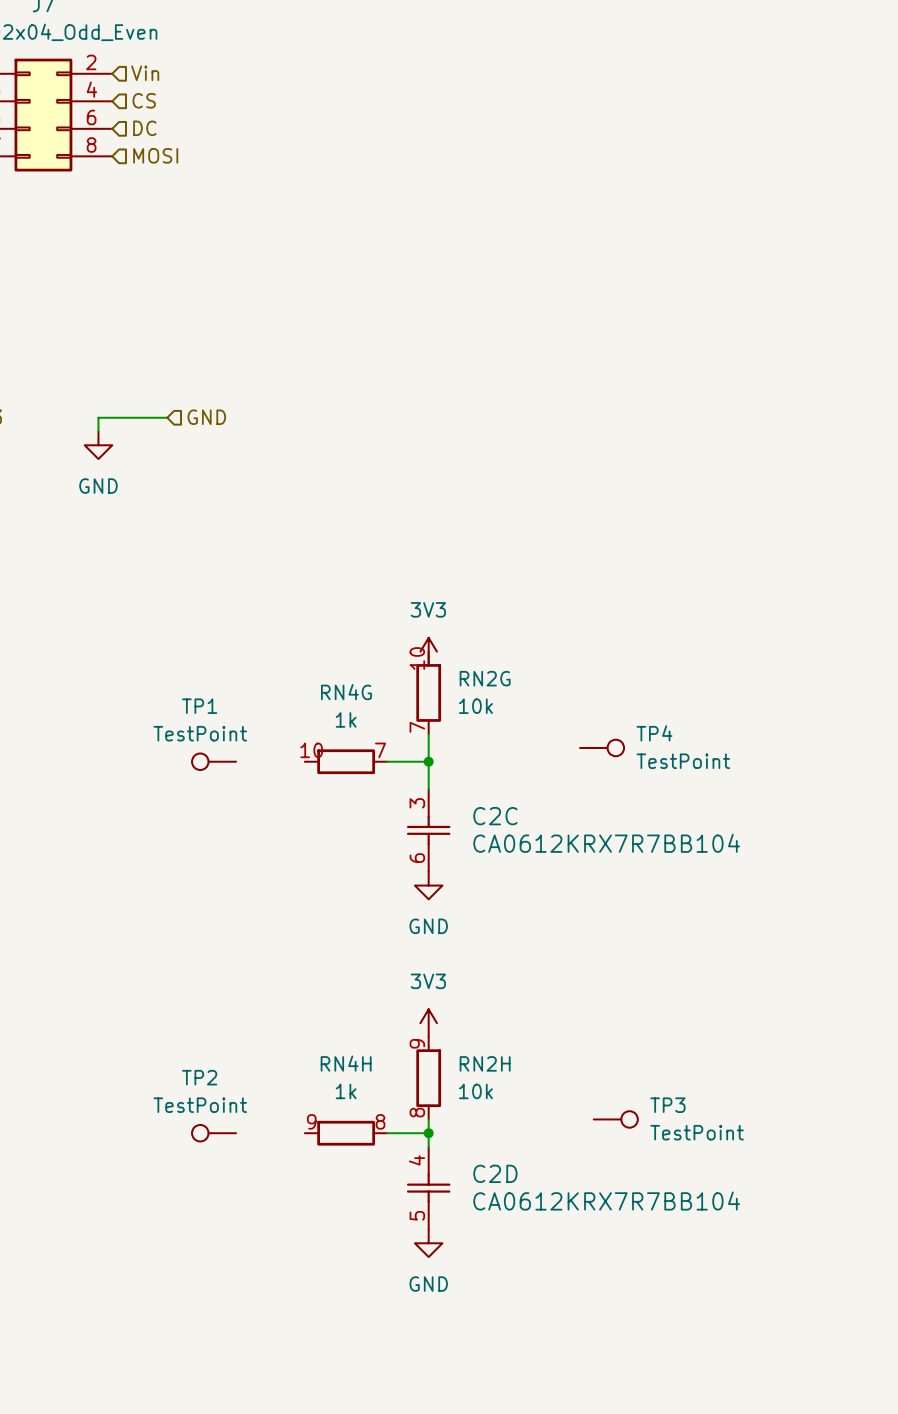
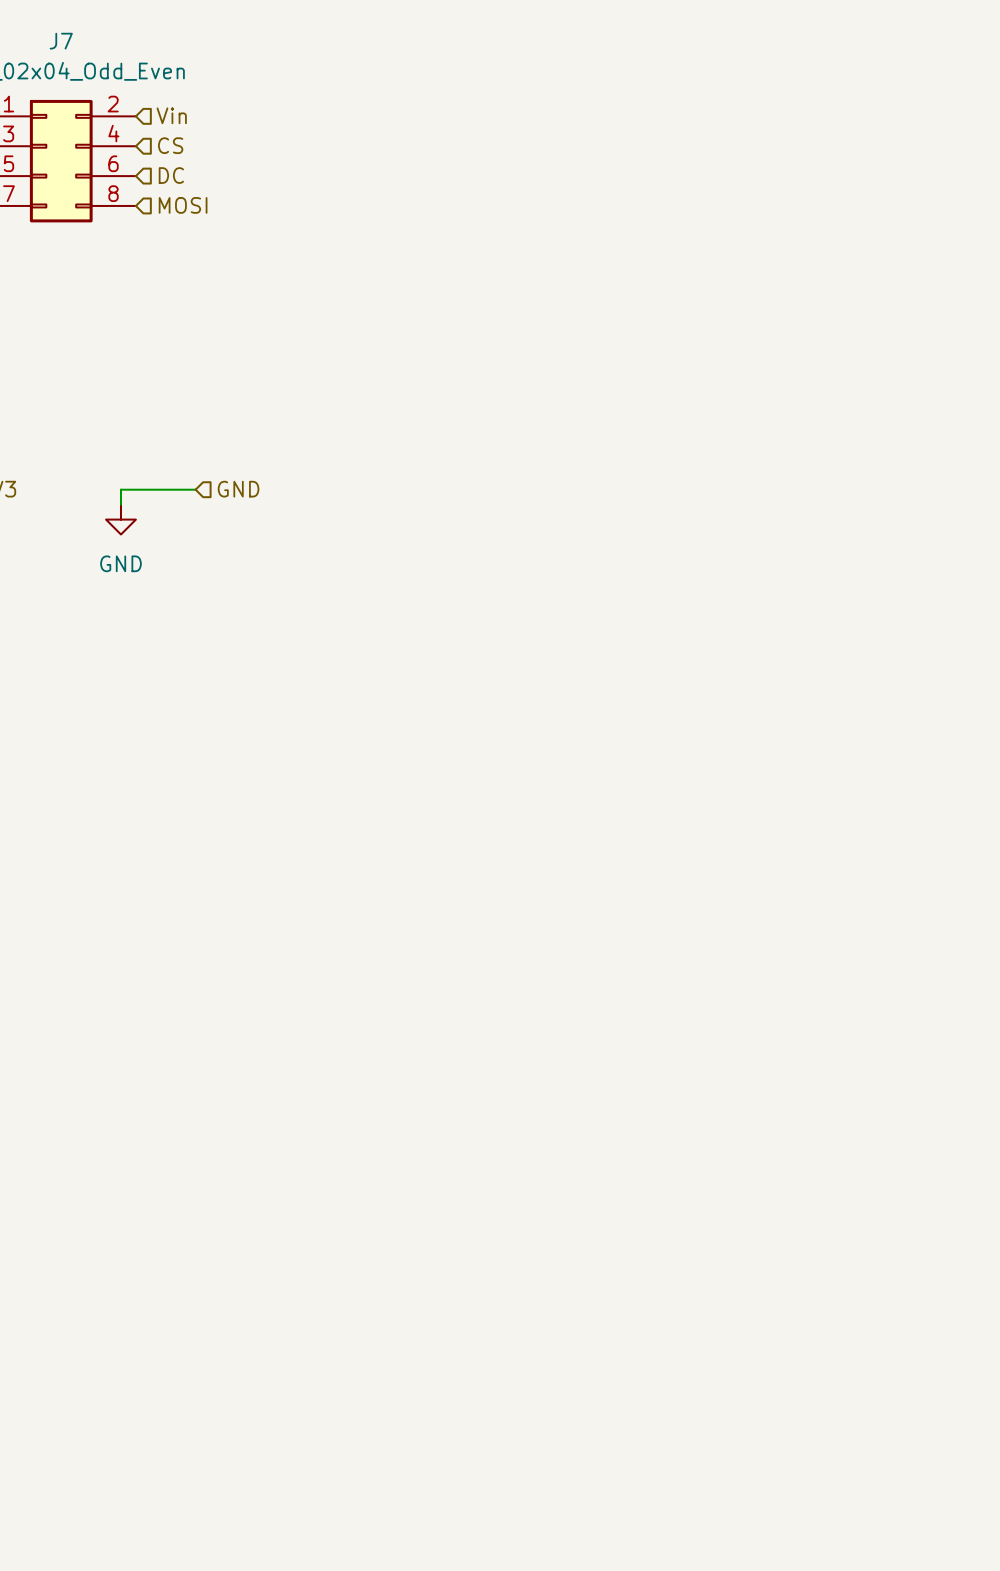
power symbol: 3V3 (428, 651) -> none
RN2G: 10k (428, 692) -> none
wire: (428, 734) (428, 789) -> none
TP4: TestPoint (602, 747) -> none
TP1: TestPoint (214, 761) -> none
RN4G: 1k (346, 761) -> none
wire: (387, 761) (428, 761) -> none
junction: (428, 761) -> none
C2C: CA0612KRX7R7BB104 (428, 830) -> none
power symbol: GND (428, 885) -> none
power symbol: 3V3 (428, 1023) -> none
RN2H: 10k (428, 1078) -> none
wire: (428, 1119) (428, 1146) -> none
TP3: TestPoint (615, 1119) -> none
TP2: TestPoint (214, 1133) -> none
RN4H: 1k (346, 1133) -> none
wire: (387, 1133) (428, 1133) -> none
junction: (428, 1133) -> none
C2D: CA0612KRX7R7BB104 (428, 1188) -> none
power symbol: GND (428, 1243) -> none

